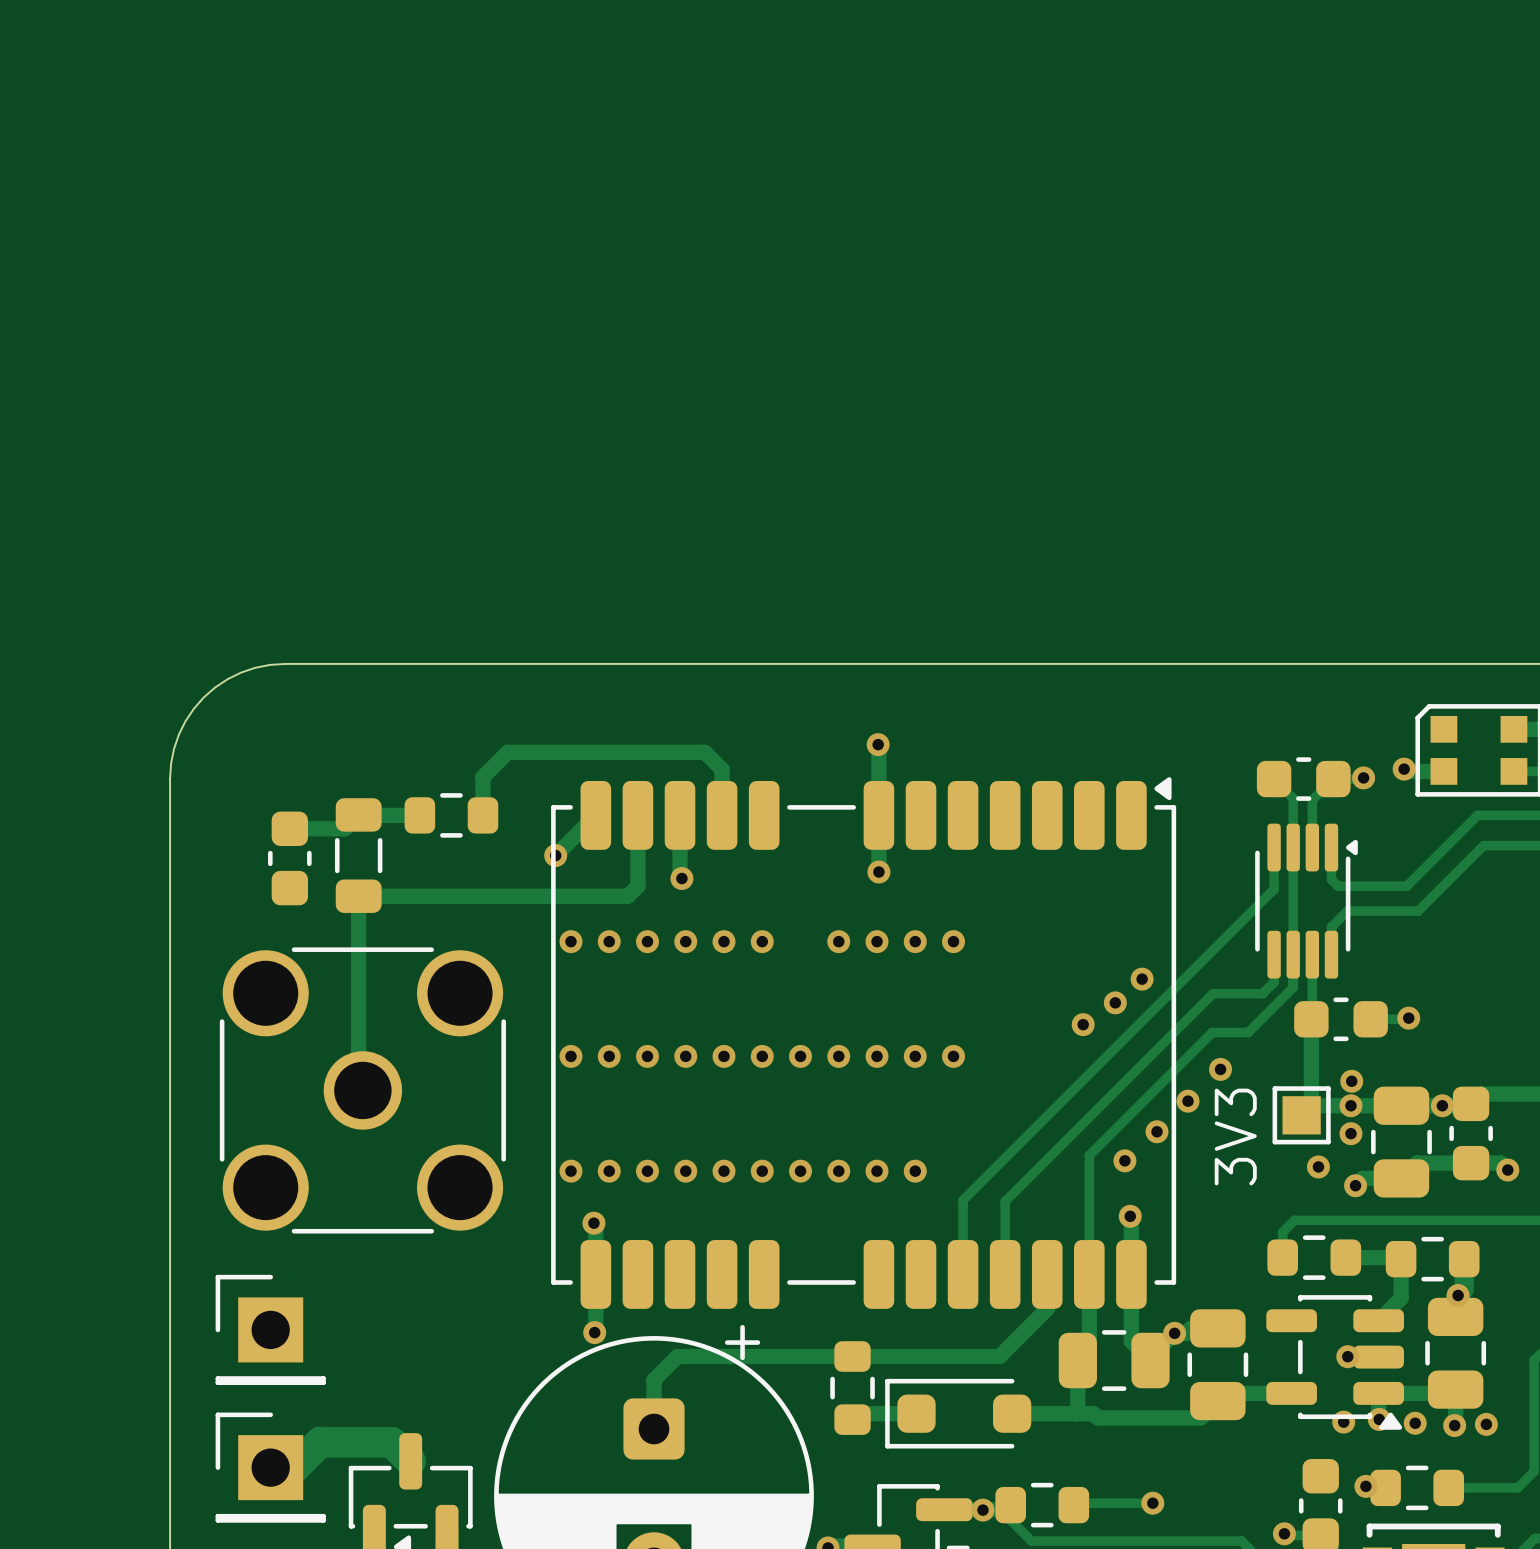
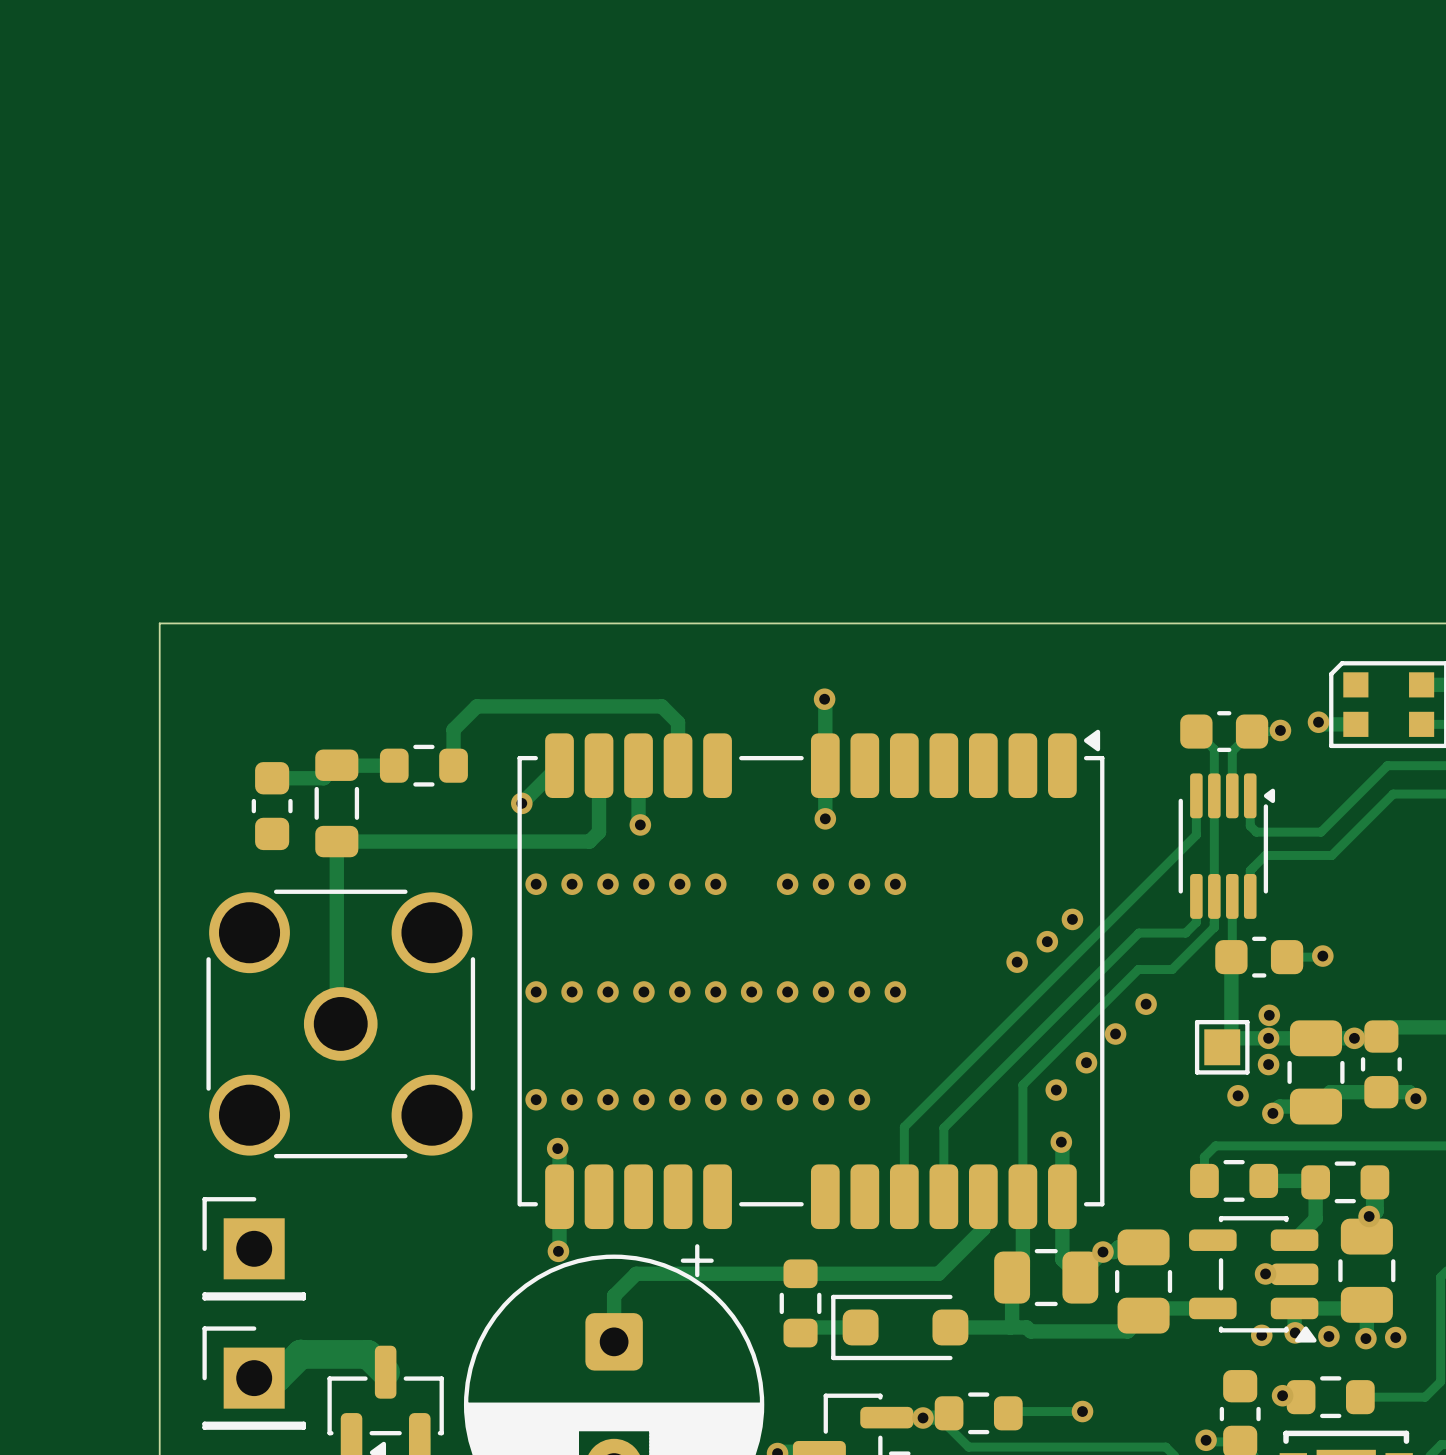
board edge: (284, 663) (269, 664) (240, 672) (214, 687) (203, 697) (193, 708) (178, 734) (174, 748) (170, 778) -> (267, 623) (159, 623) (159, 731)
text: 3V3 (1235, 1137) -> none

